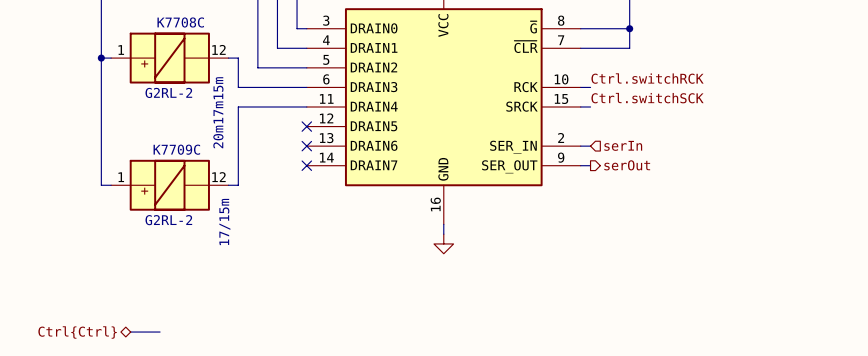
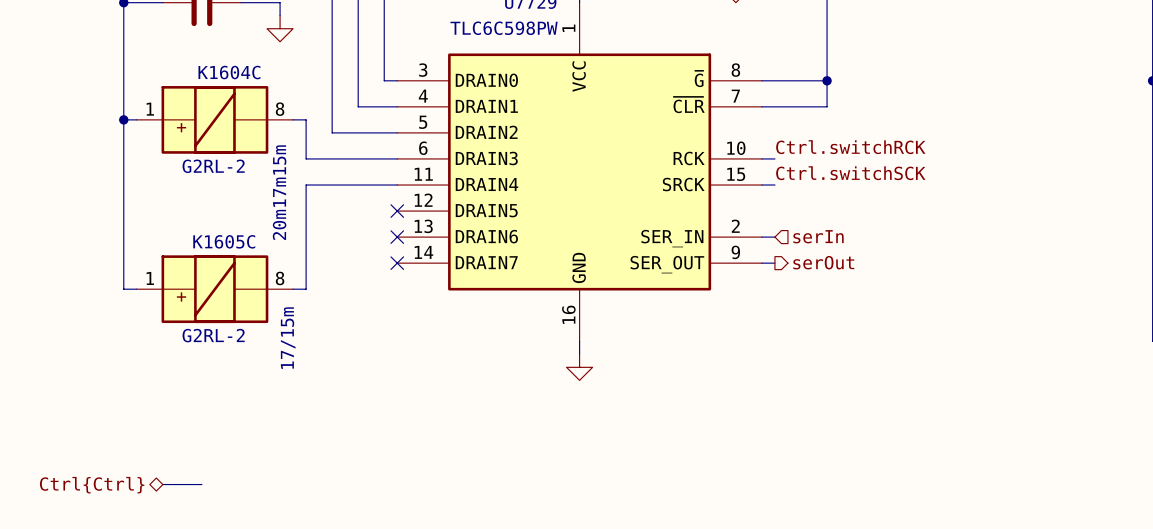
K7708C name: K7708C (180, 22) -> K1604C (229, 72)
K7708C pin number: 12 (218, 49) -> 8 (280, 109)
K7709C name: K7709C (176, 149) -> K1605C (224, 241)
K7709C pin number: 12 (218, 177) -> 8 (280, 278)

